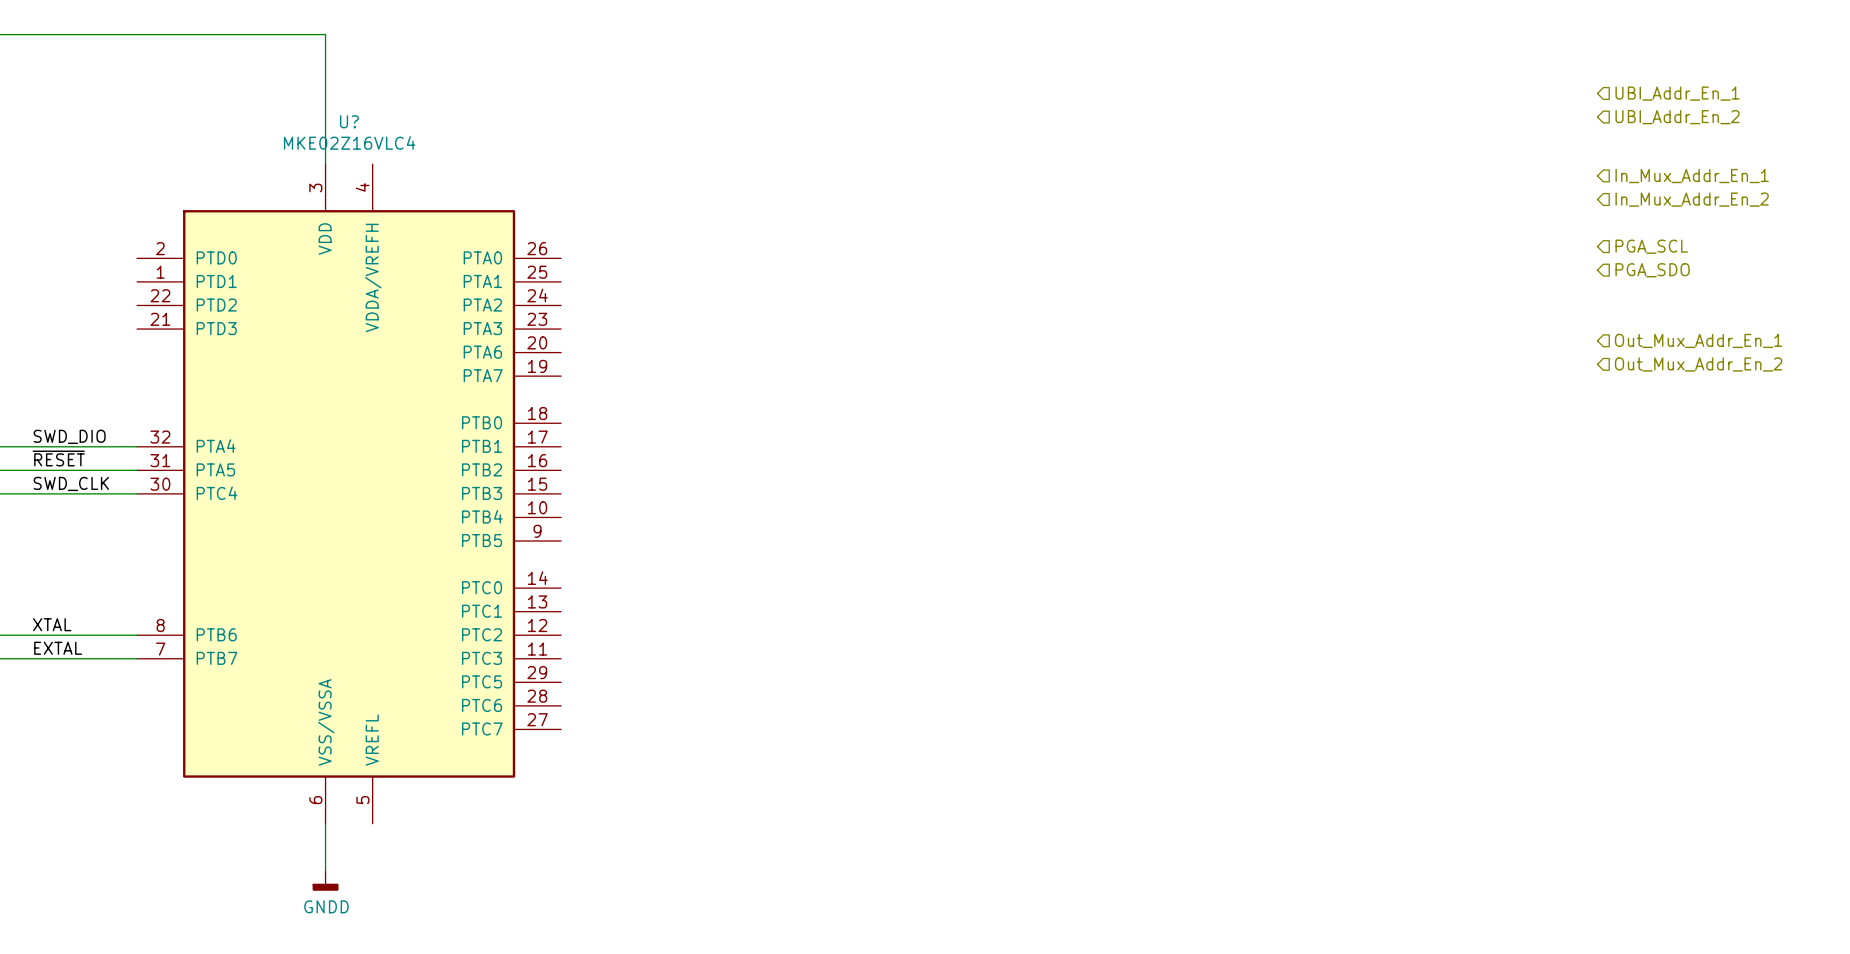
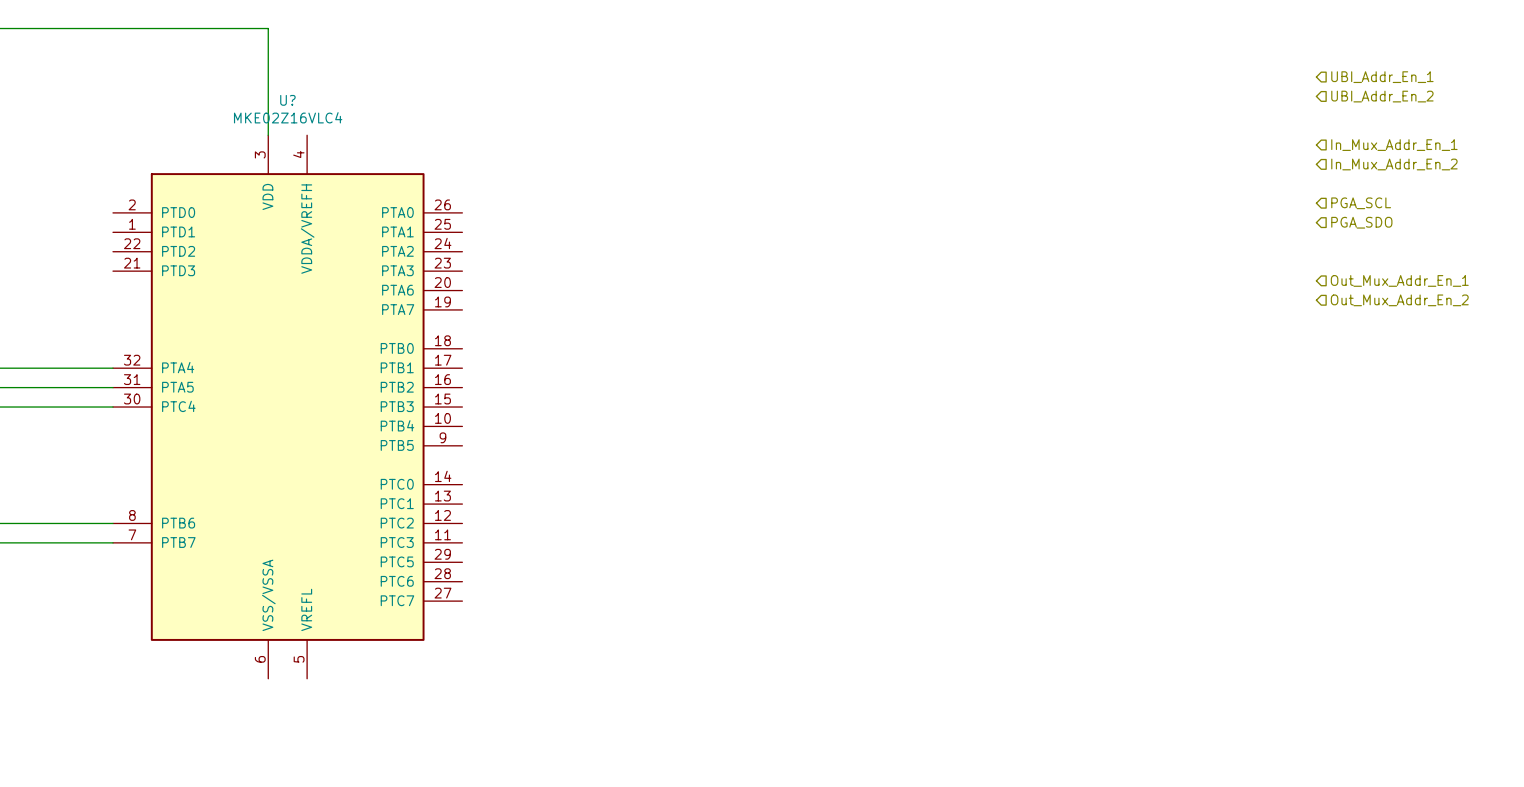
label: SWD_DIO (69, 436) -> none
label: ~{RESET} (58, 458) -> none
label: SWD_CLK (71, 483) -> none
label: XTAL (52, 624) -> none
label: EXTAL (58, 648) -> none
wire: (325, 823) (325, 870) -> none
power symbol: GNDD (325, 880) -> none

